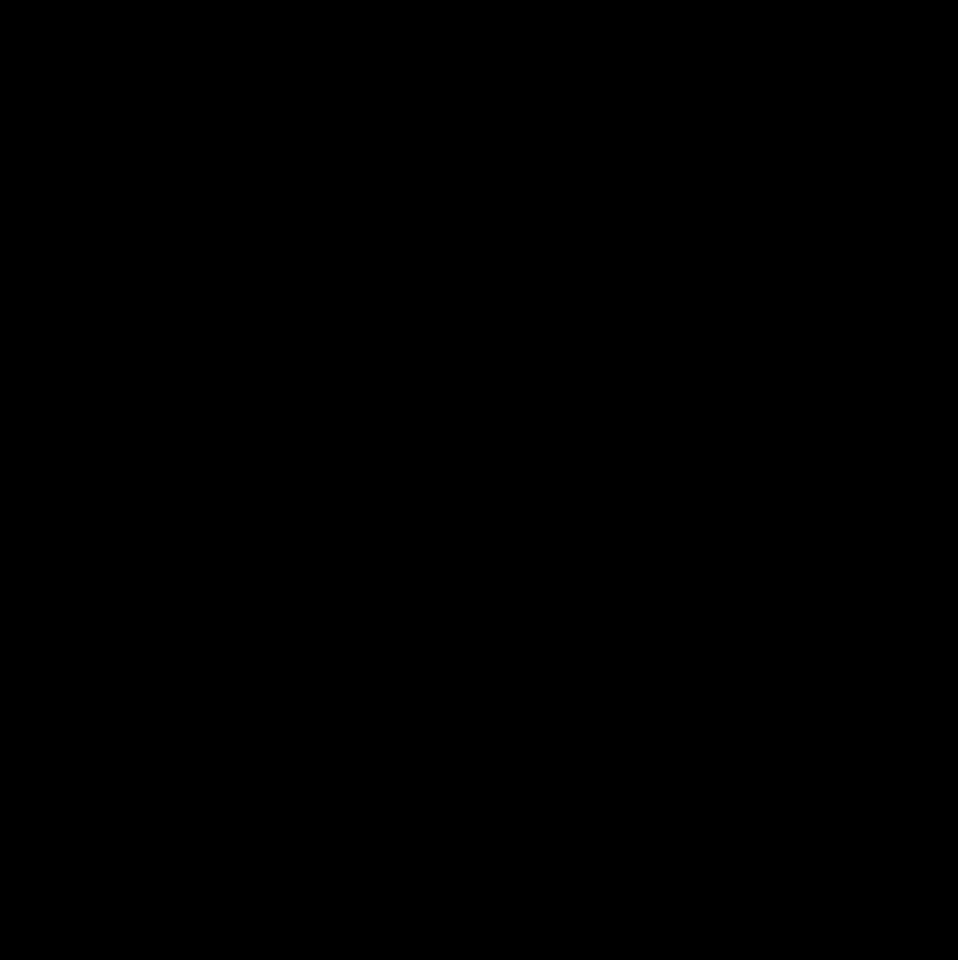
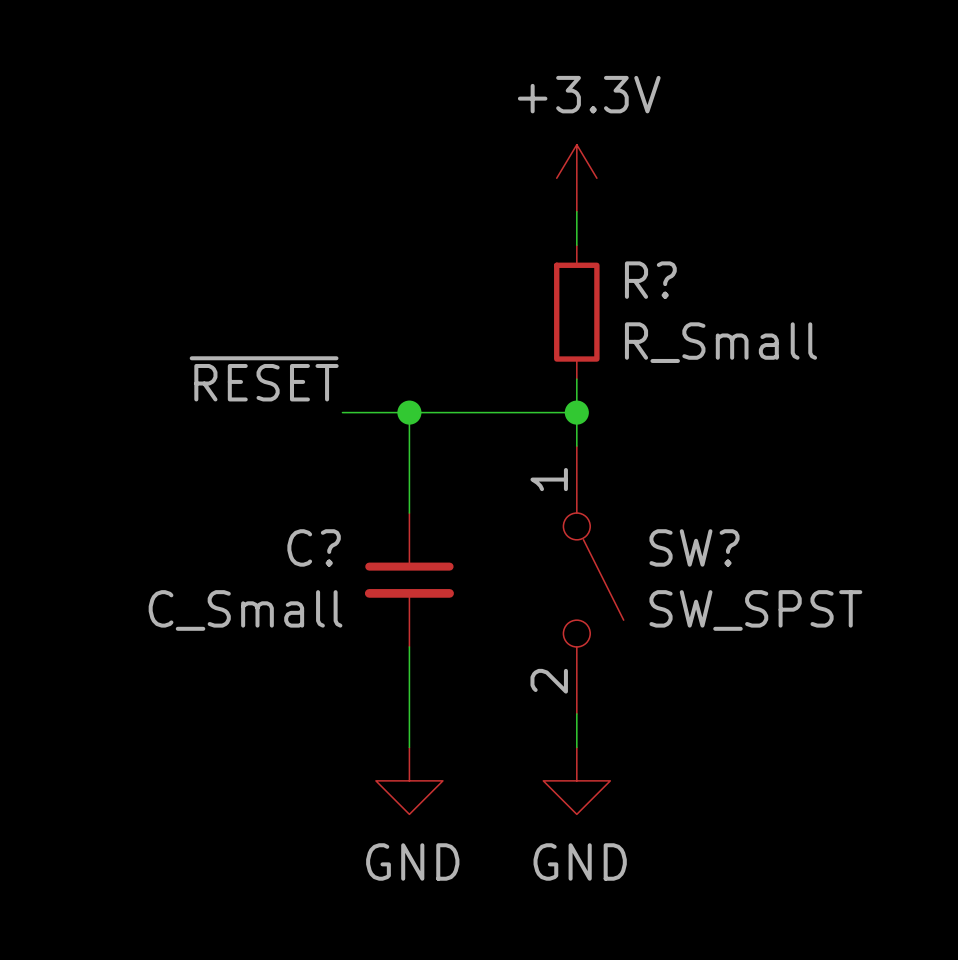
power symbol: none -> +3.3V (576, 178)
wire: none -> (576, 211) (576, 245)
R?: none -> R_Small (576, 312)
label: none -> ~{RESET} (264, 378)
wire: none -> (576, 379) (576, 446)
wire: none -> (342, 412) (576, 412)
wire: none -> (409, 412) (409, 513)
junction: none -> (409, 412)
junction: none -> (576, 412)
C?: none -> C_Small (409, 579)
SW?: none -> SW_SPST (593, 579)
wire: none -> (409, 646) (409, 747)
wire: none -> (576, 713) (576, 747)
power symbol: none -> GND (409, 780)
power symbol: none -> GND (576, 780)

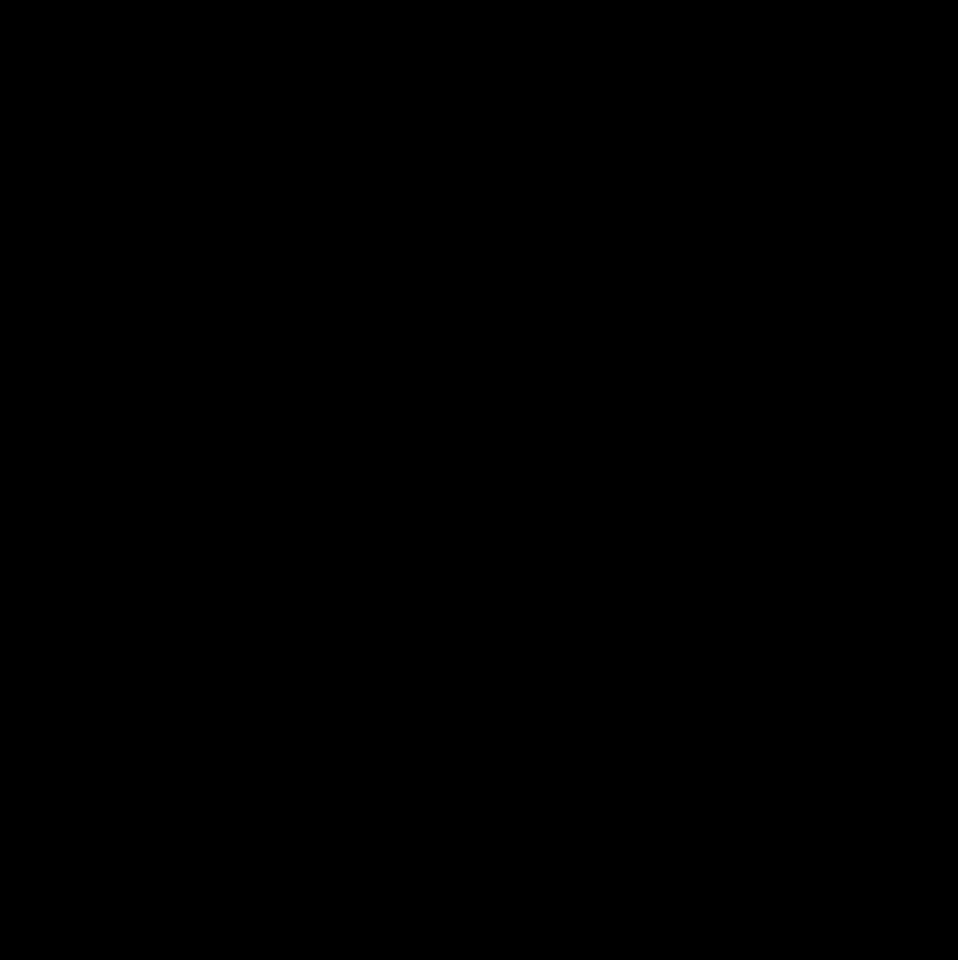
power symbol: +3.3V (576, 178) -> none
wire: (576, 211) (576, 245) -> none
R?: R_Small (576, 312) -> none
label: ~{RESET} (264, 378) -> none
wire: (576, 379) (576, 446) -> none
wire: (342, 412) (576, 412) -> none
wire: (409, 412) (409, 513) -> none
junction: (409, 412) -> none
junction: (576, 412) -> none
C?: C_Small (409, 579) -> none
SW?: SW_SPST (593, 579) -> none
wire: (409, 646) (409, 747) -> none
wire: (576, 713) (576, 747) -> none
power symbol: GND (409, 780) -> none
power symbol: GND (576, 780) -> none

